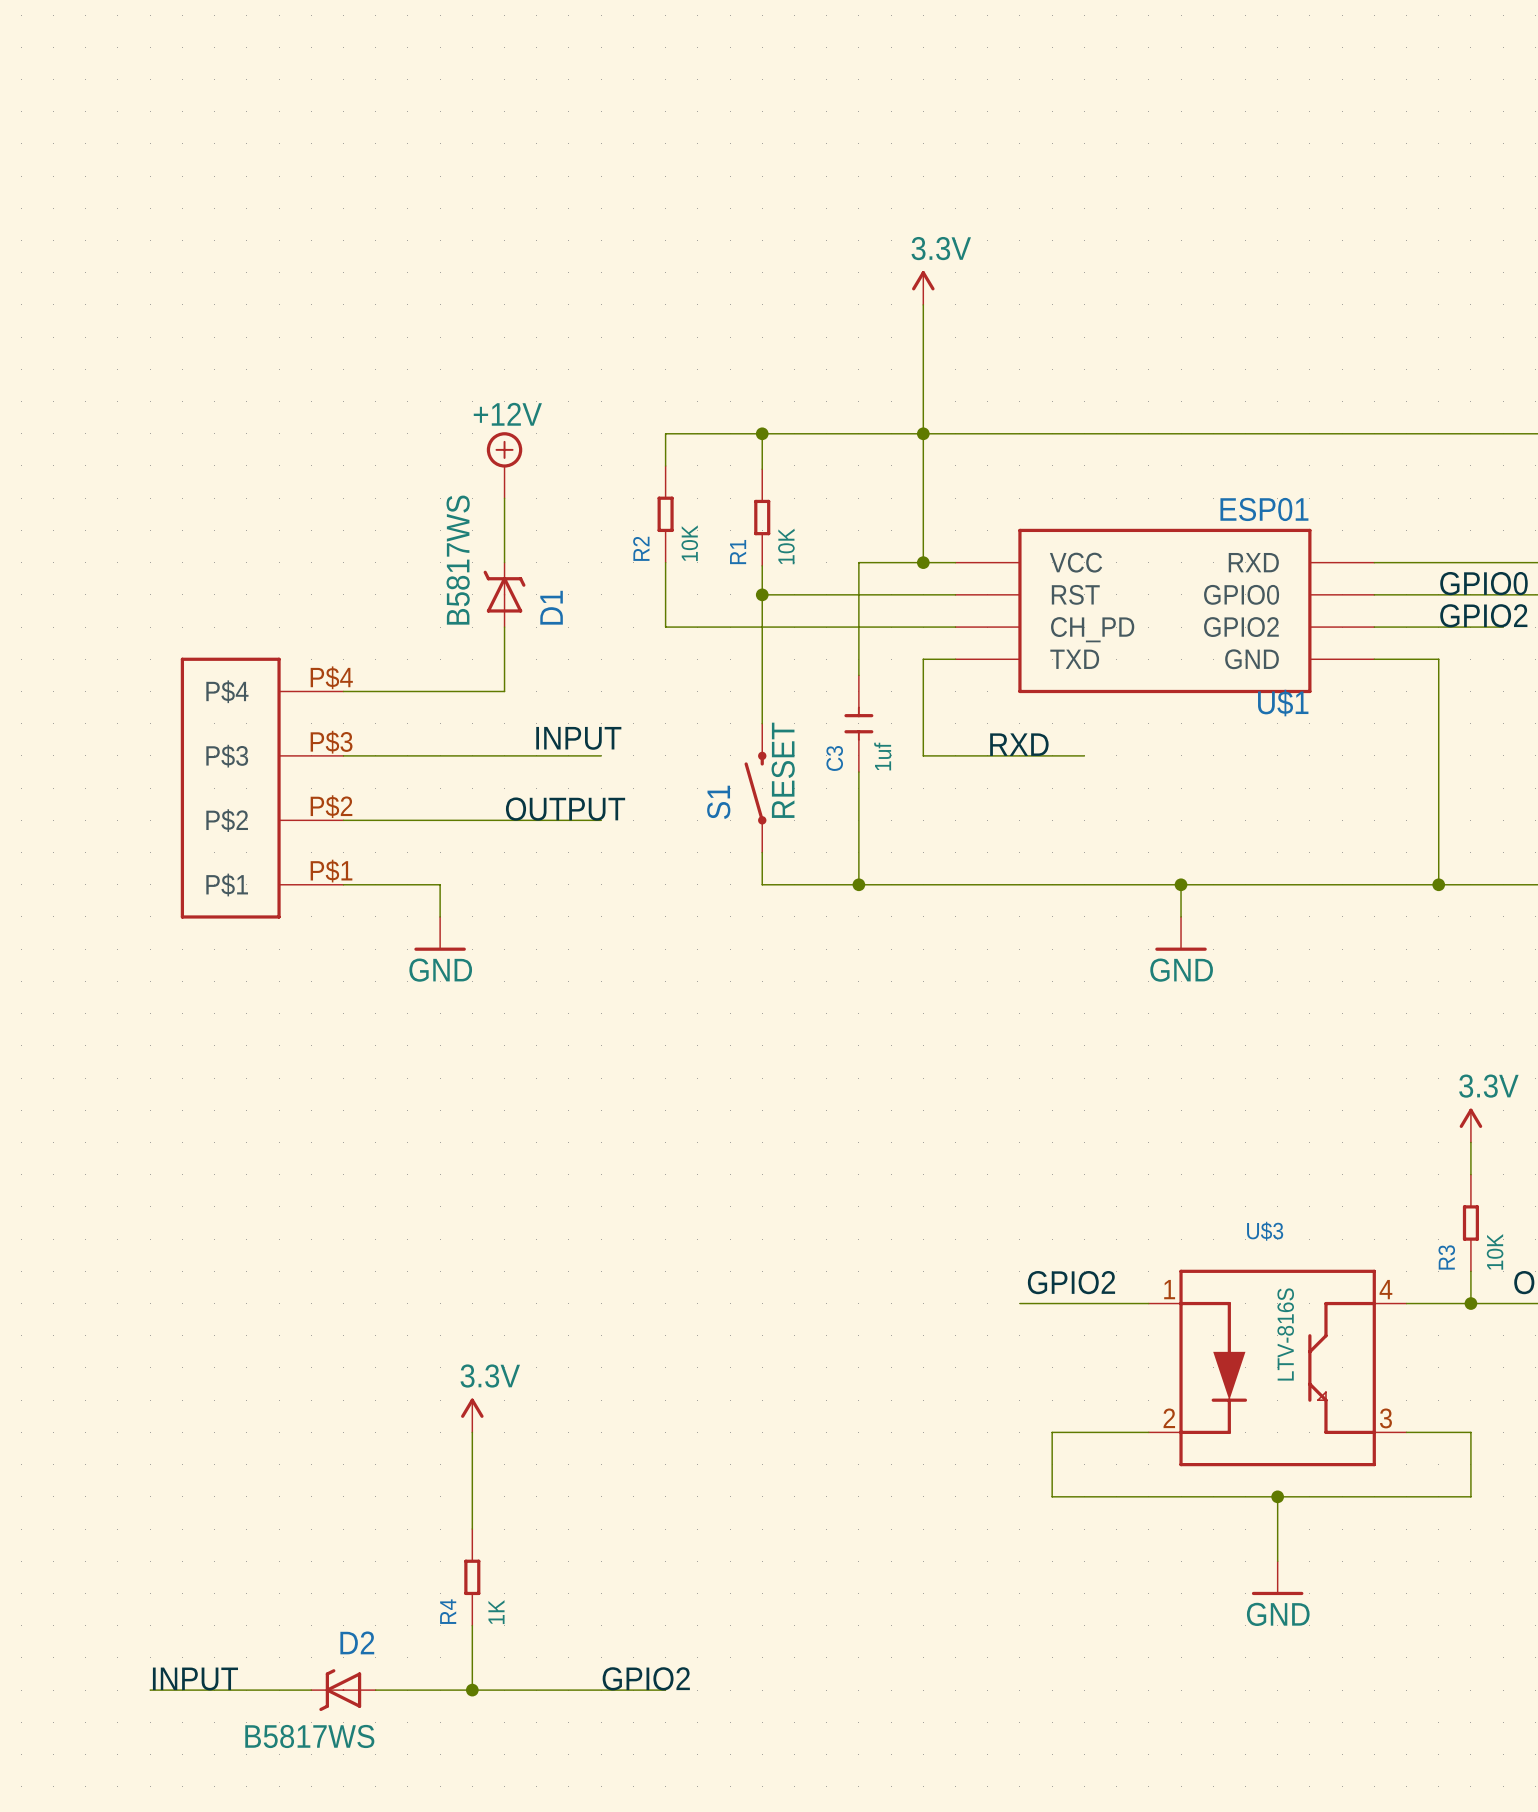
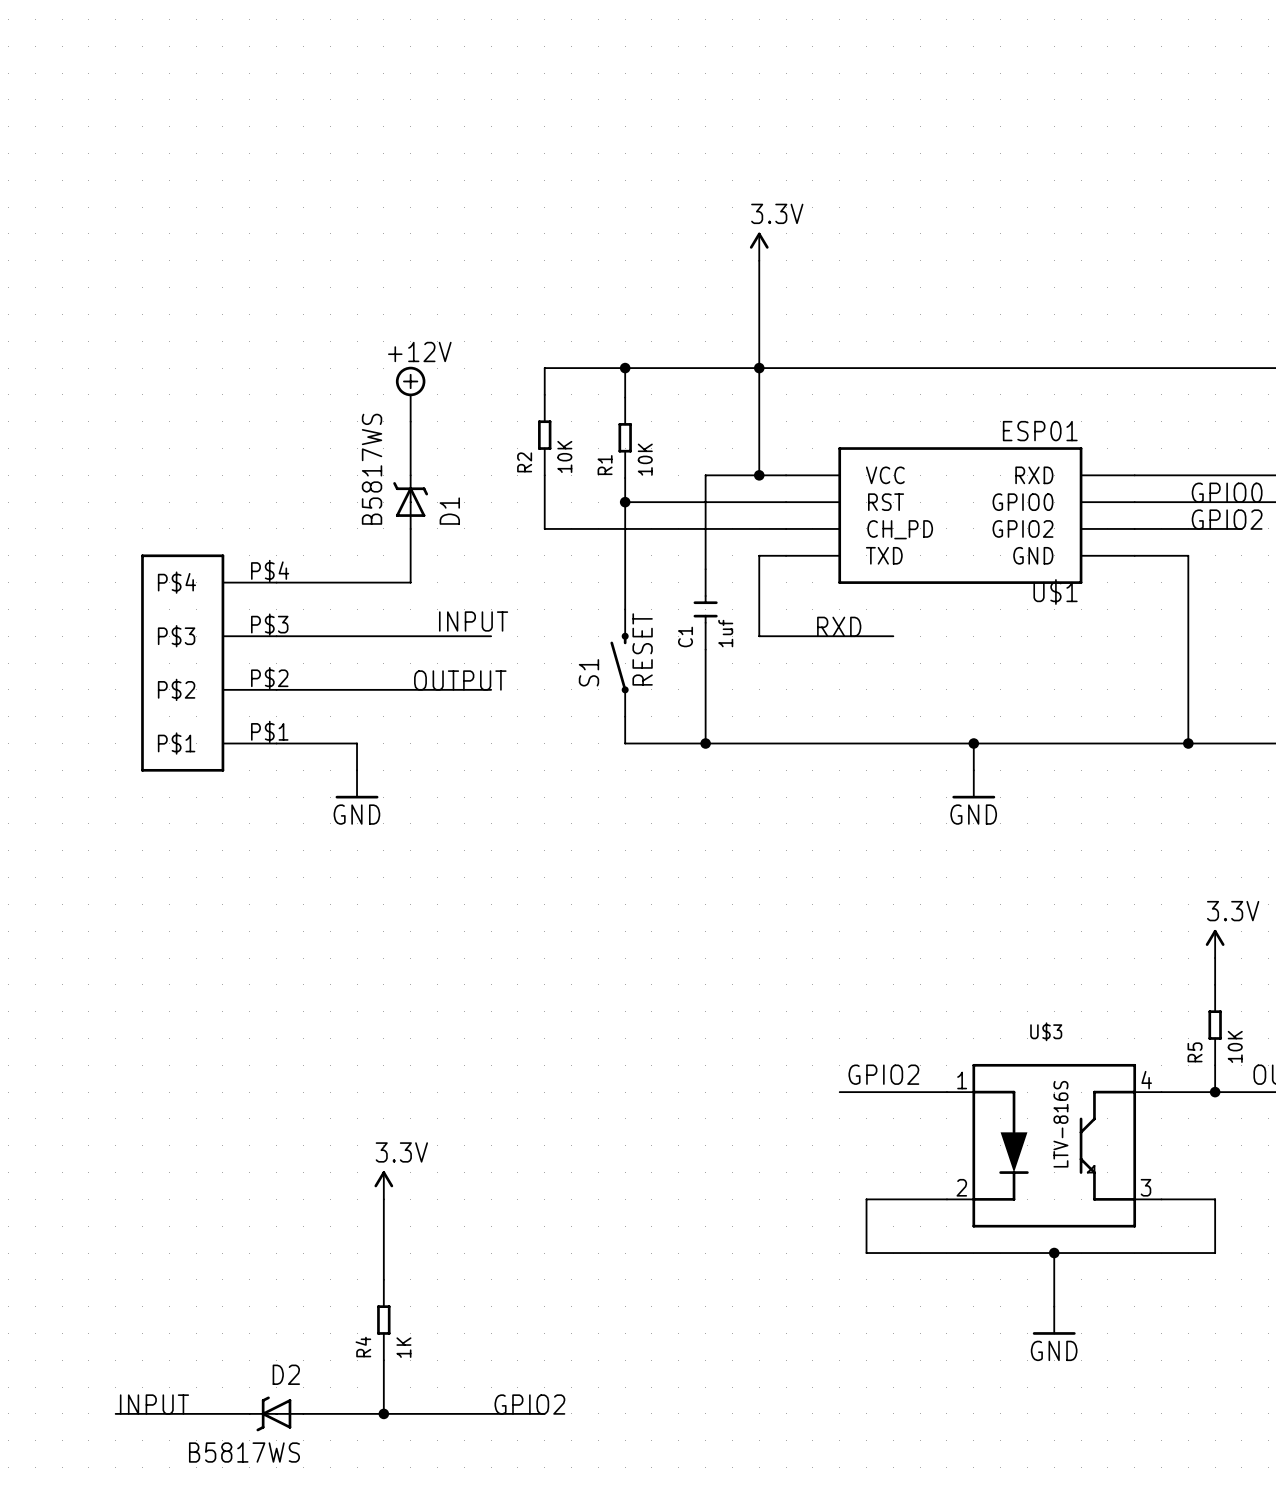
C3 name: C3 (834, 758) -> C1 (685, 636)
R3 name: R3 (1446, 1257) -> R5 (1195, 1052)

